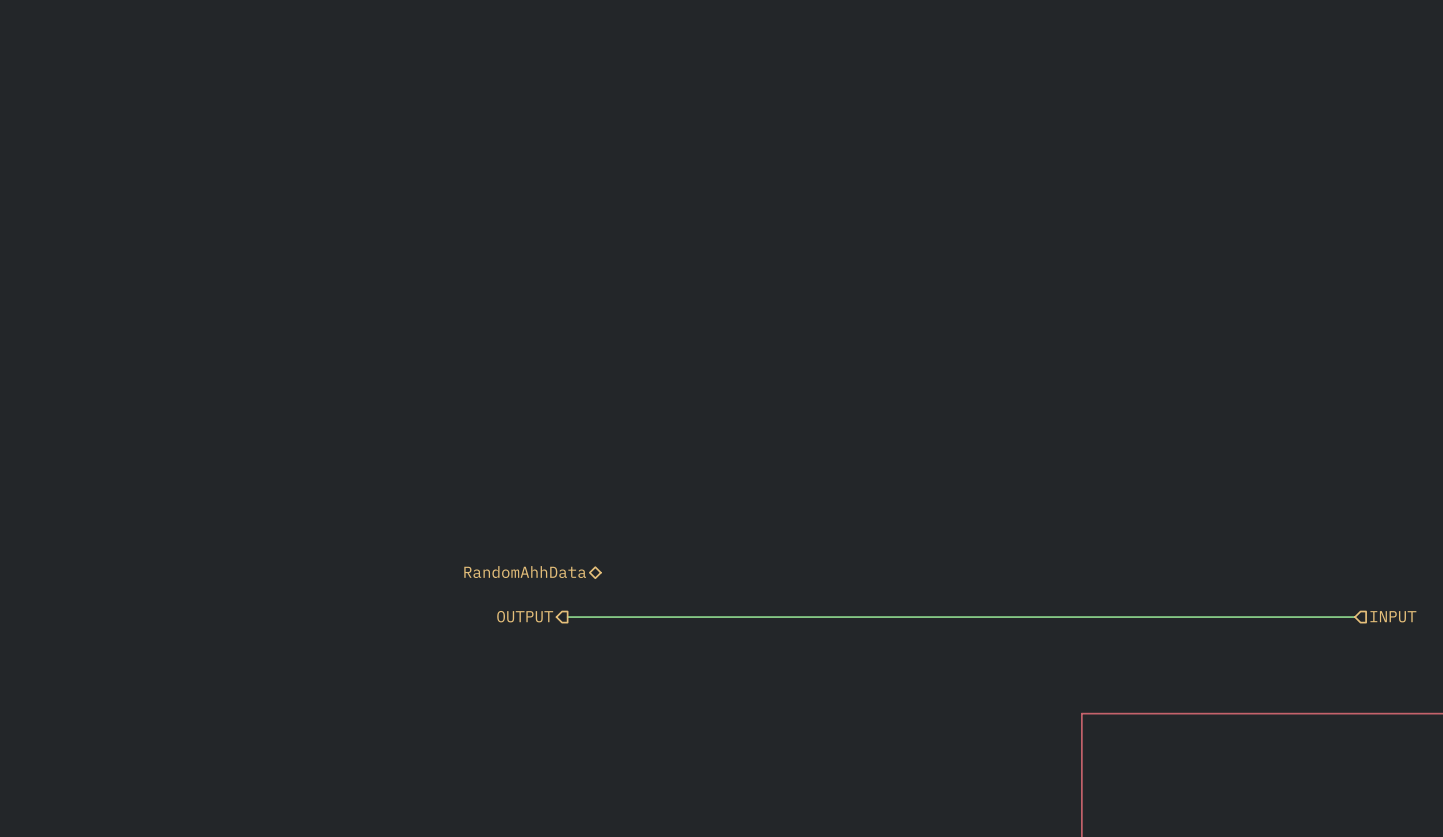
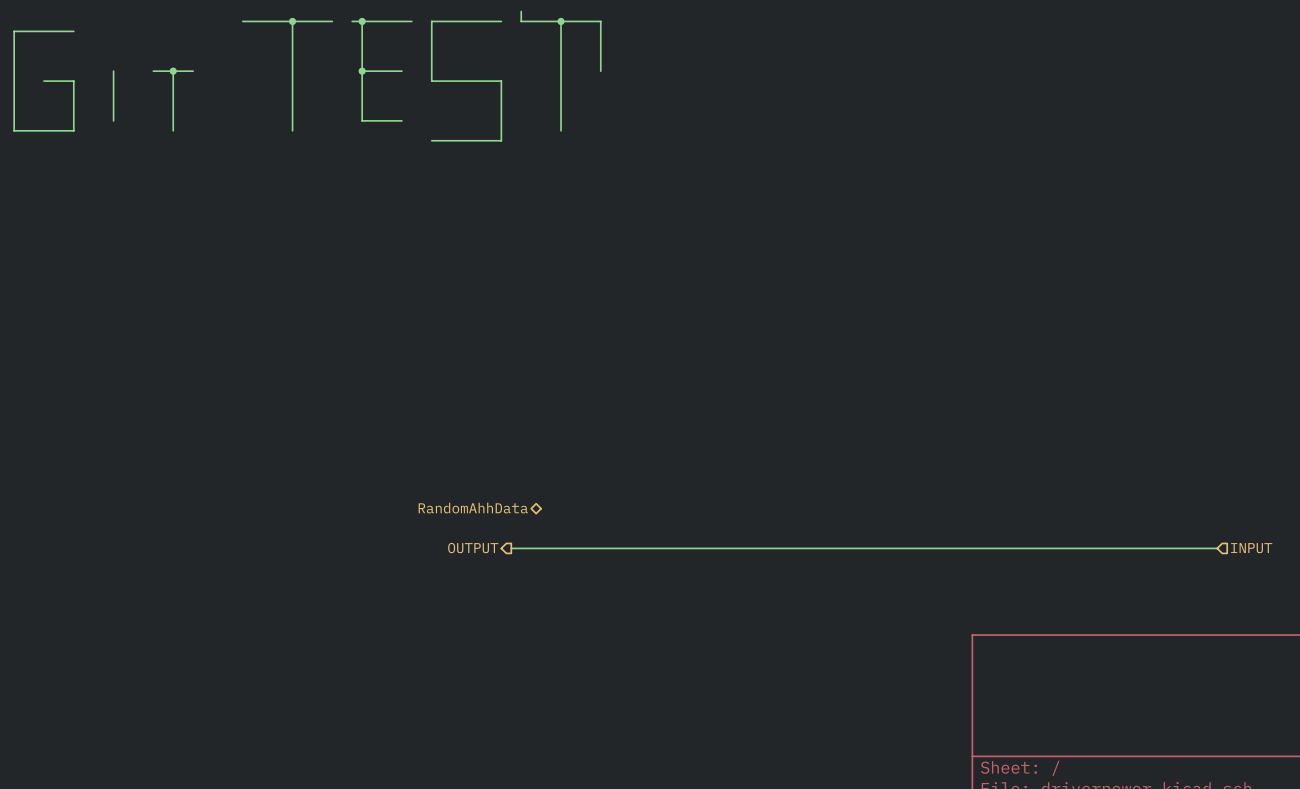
wire: none -> (521, 11) (521, 21) (600, 21) (600, 71)
wire: none -> (242, 21) (332, 21)
wire: none -> (292, 21) (292, 130)
junction: none -> (292, 21)
wire: none -> (352, 21) (411, 21)
wire: none -> (362, 21) (362, 120) (401, 120)
junction: none -> (362, 21)
wire: none -> (501, 21) (431, 21) (431, 81) (501, 81) (501, 140) (431, 140)
wire: none -> (561, 21) (561, 130)
junction: none -> (561, 21)
wire: none -> (73, 31) (14, 31) (14, 130) (73, 130) (73, 81) (43, 81)
wire: none -> (113, 71) (113, 120)
wire: none -> (153, 71) (193, 71)
wire: none -> (173, 71) (173, 130)
junction: none -> (173, 71)
wire: none -> (362, 71) (401, 71)
junction: none -> (362, 71)

